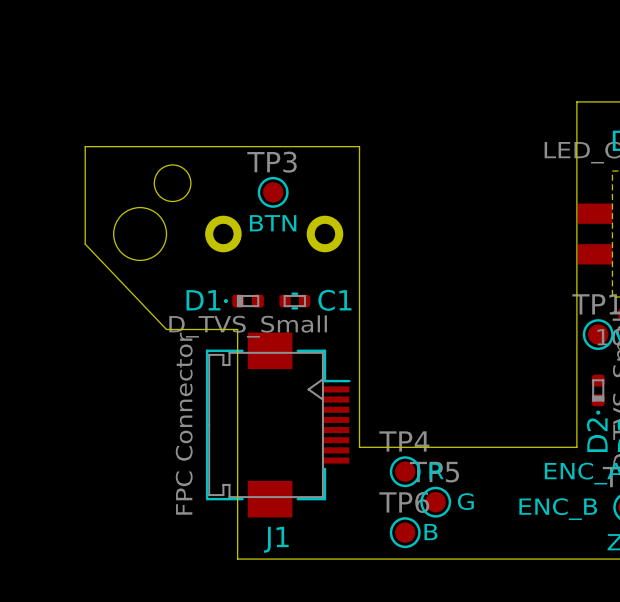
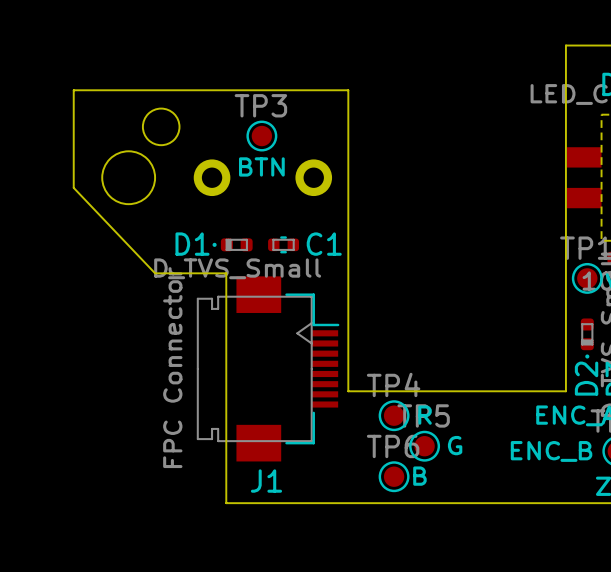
J1 footprint: [205, 332, 351, 518] -> [196, 276, 340, 462]

